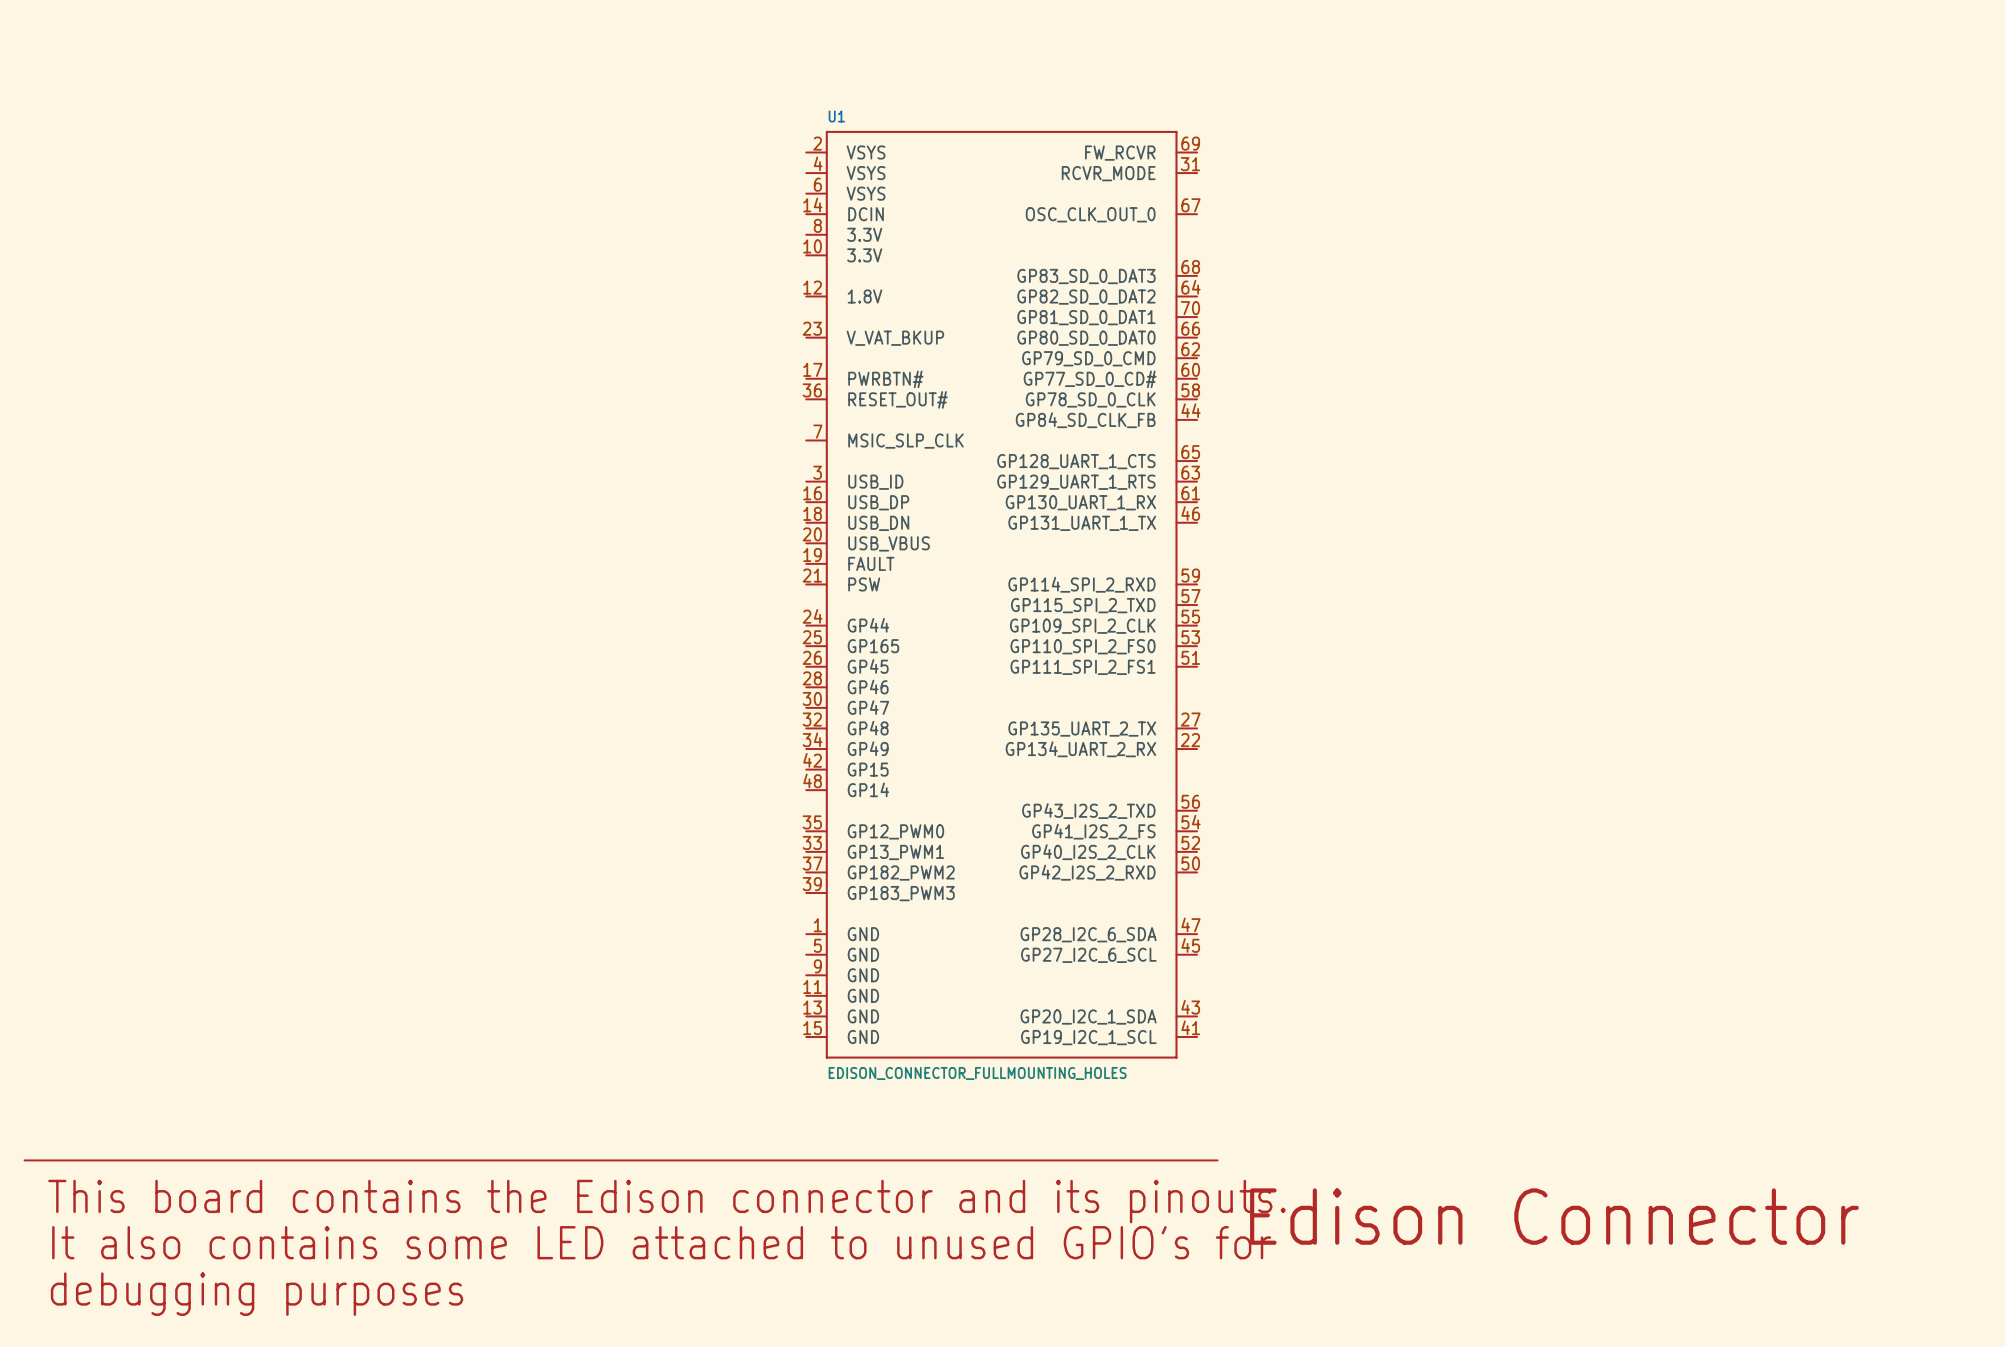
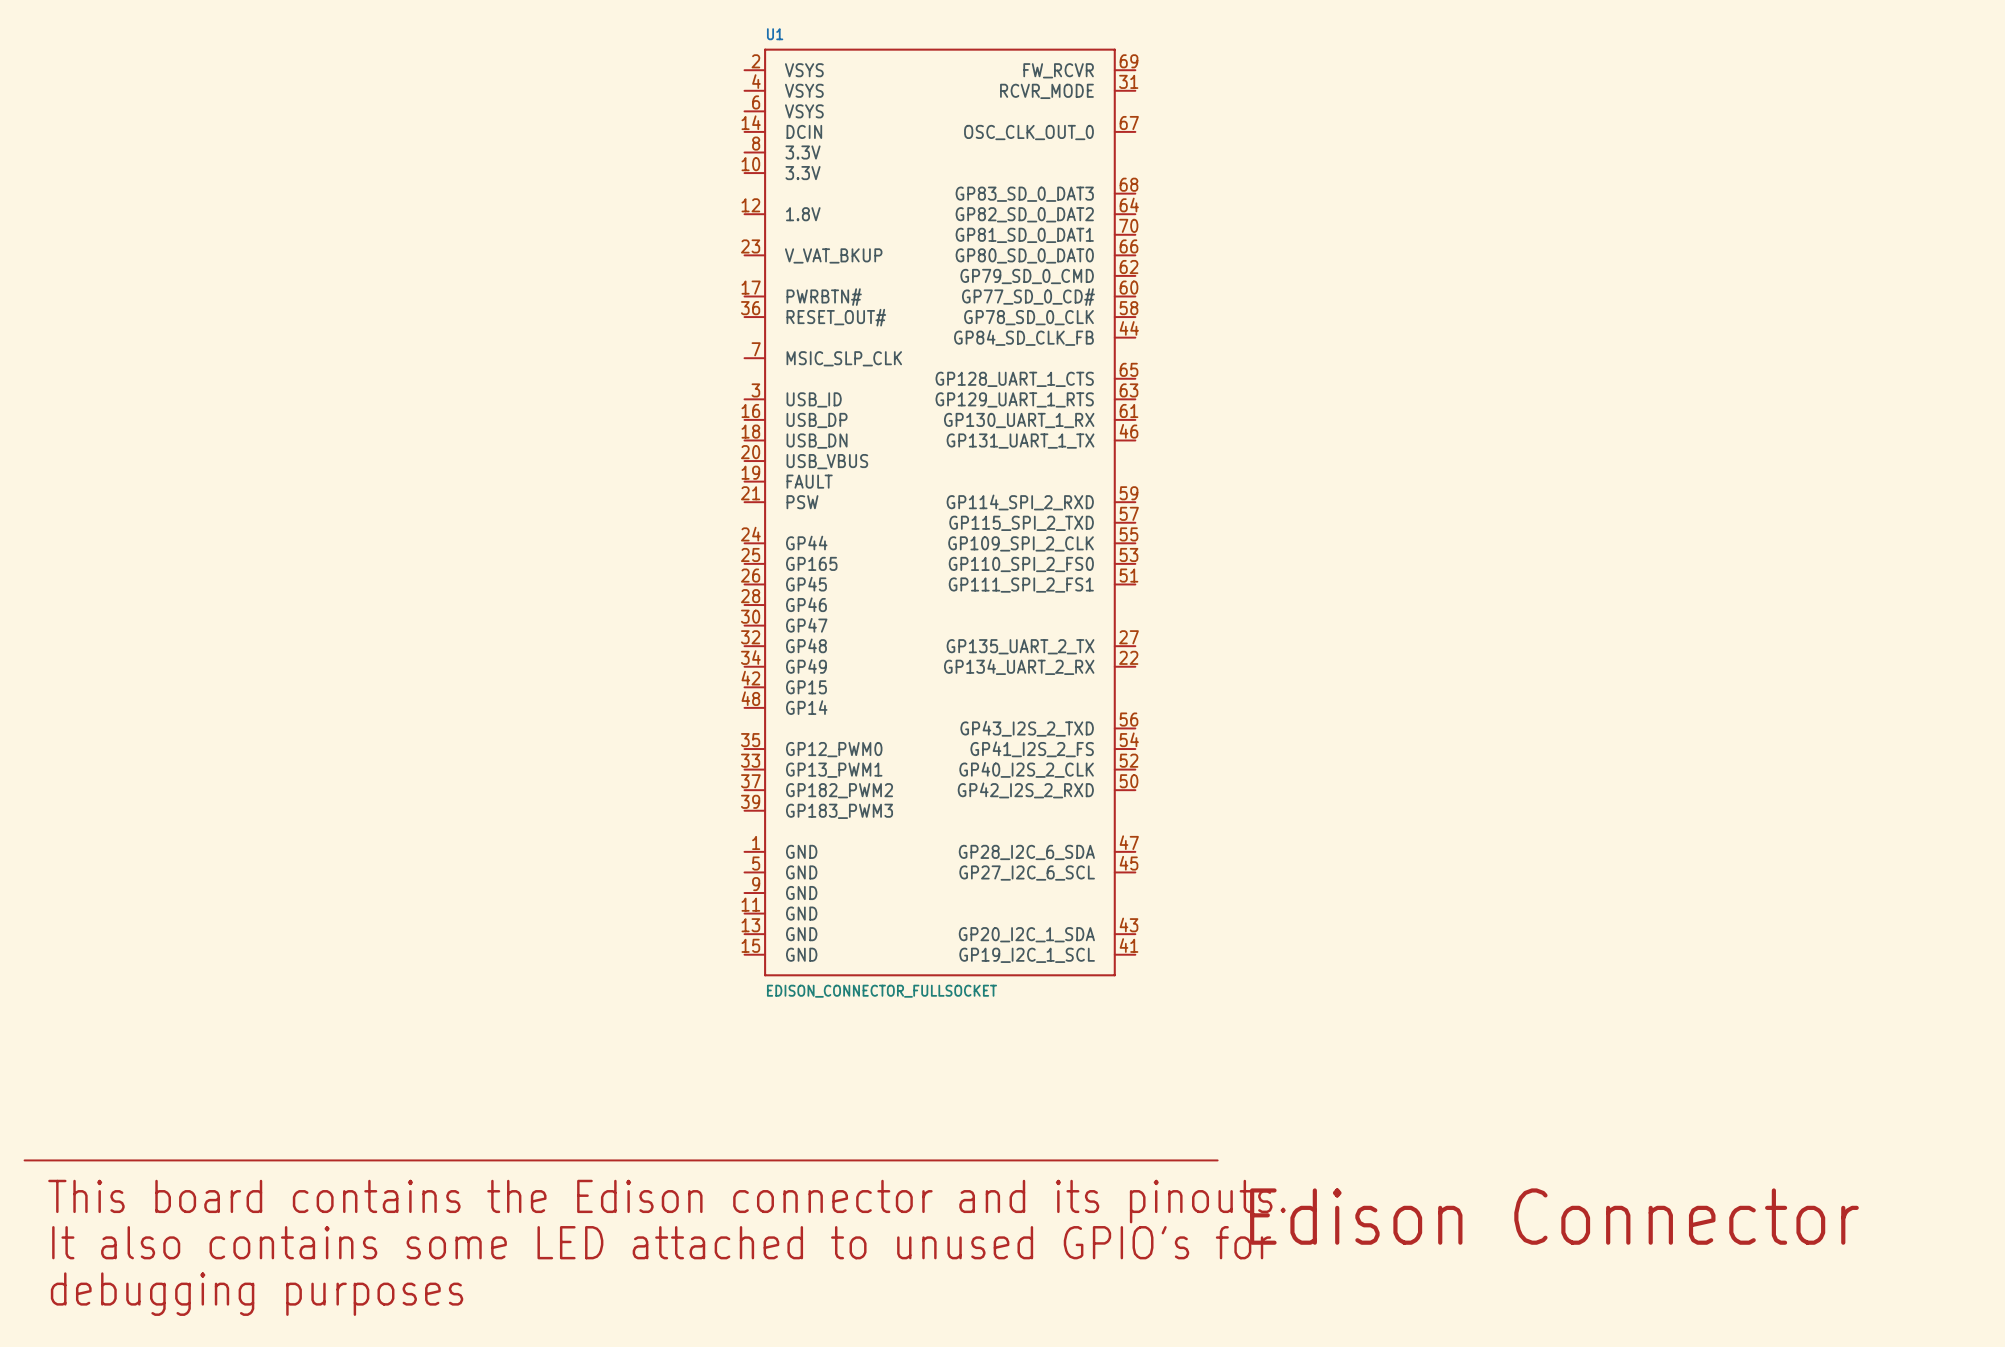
U1 position: (1001, 594) -> (939, 512)
U1 value: EDISON_CONNECTOR_FULLMOUNTING_HOLES (977, 1073) -> EDISON_CONNECTOR_FULLSOCKET (882, 991)

